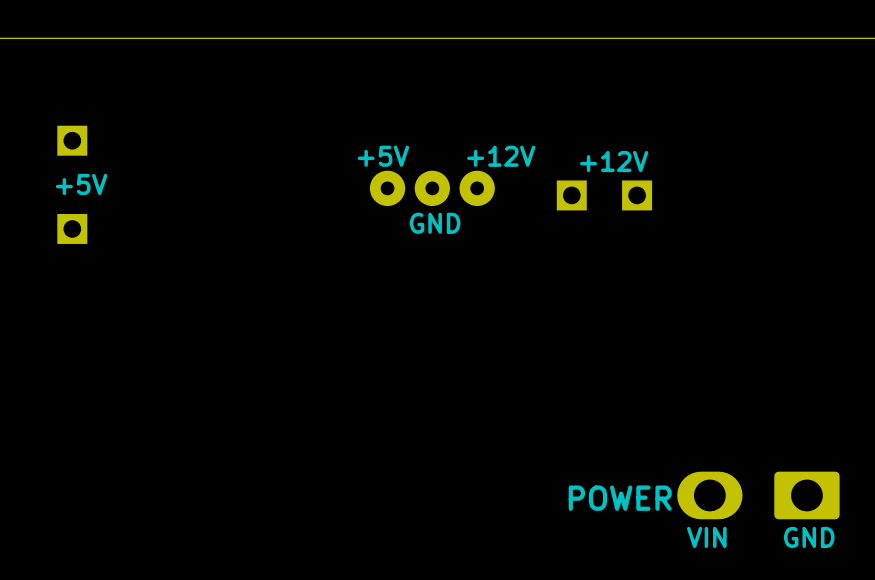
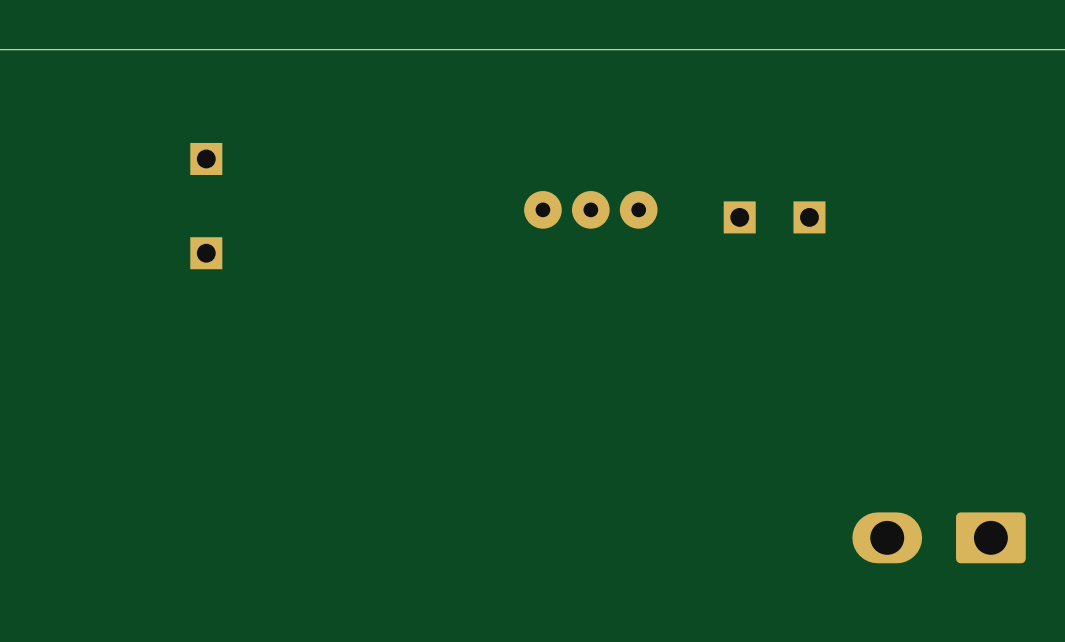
text: +5V (383, 156) -> none
text: +12V (501, 156) -> none
text: +12V (614, 161) -> none
text: +5V (81, 184) -> none
text: GND (435, 223) -> none
text: POWER (620, 498) -> none
text: VIN (706, 537) -> none
text: GND (809, 537) -> none

